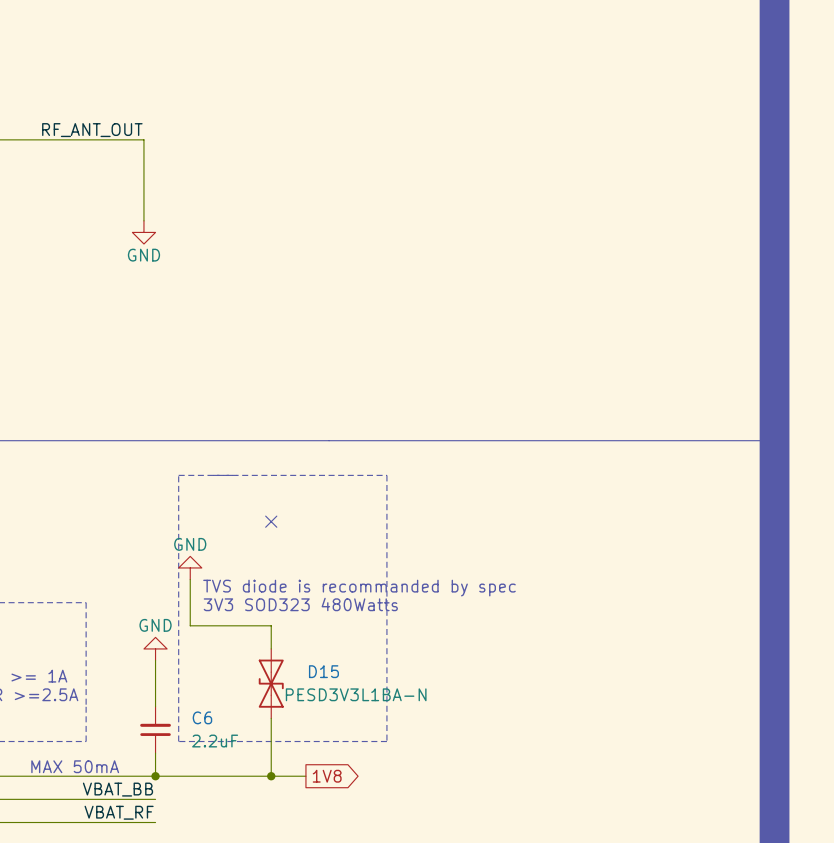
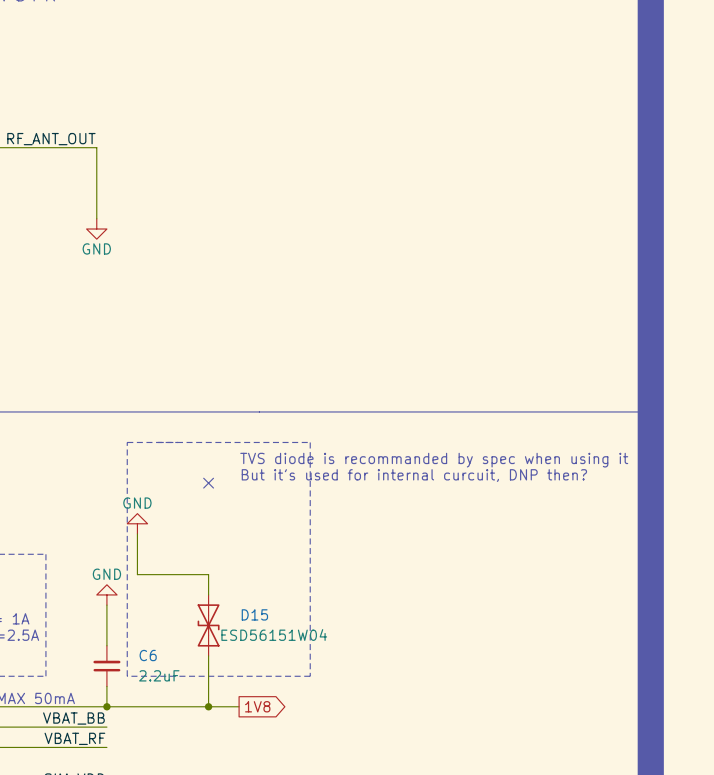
text: none -> TVS diode is recommanded by spec when using it (434, 460)
text: none -> But it's used for internal curcuit, DNP then? (414, 475)
text: TVS diode is recommanded by spec (359, 588) -> none
text: 3V3 SOD323 480Watts (300, 604) -> none
D15 value: PESD3V3L1BA-N (356, 694) -> ESD56151W04 (274, 634)

